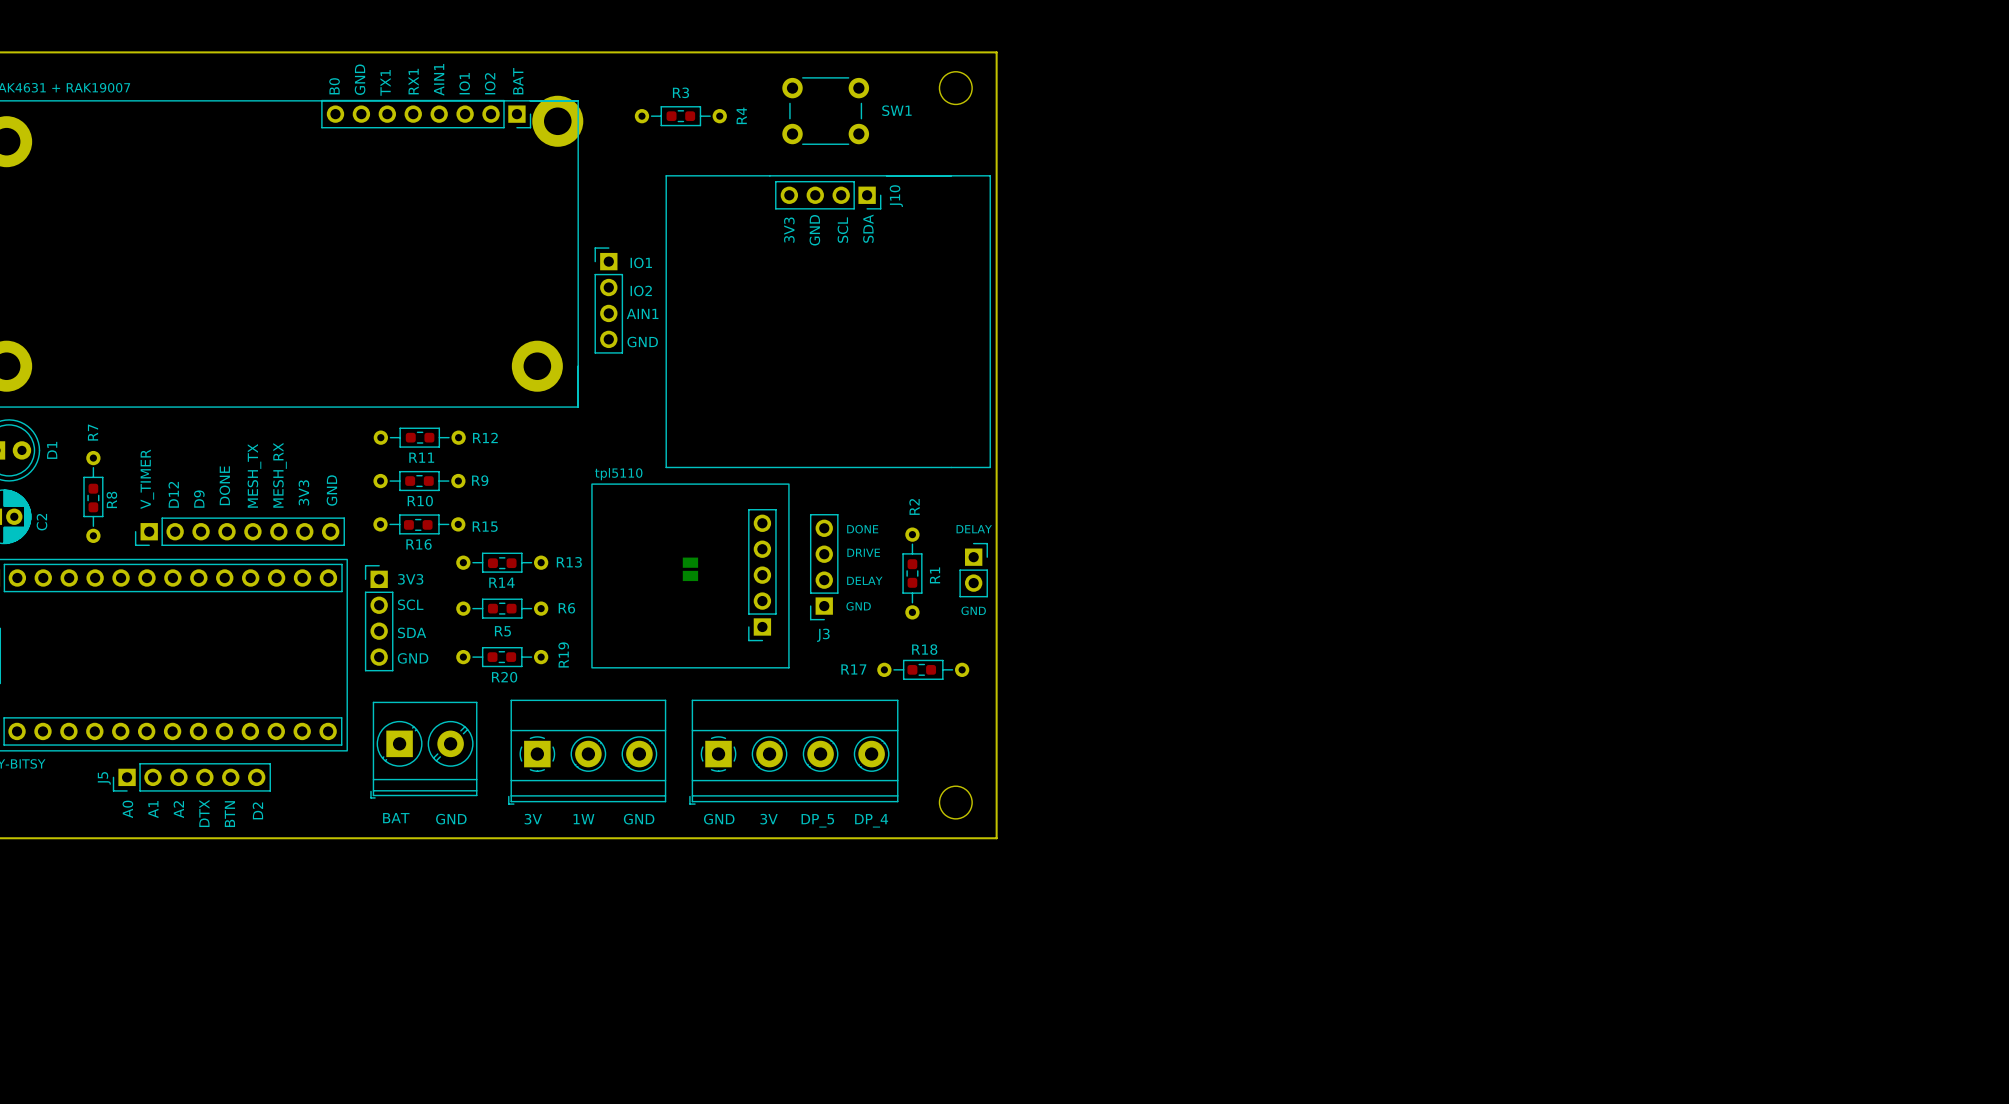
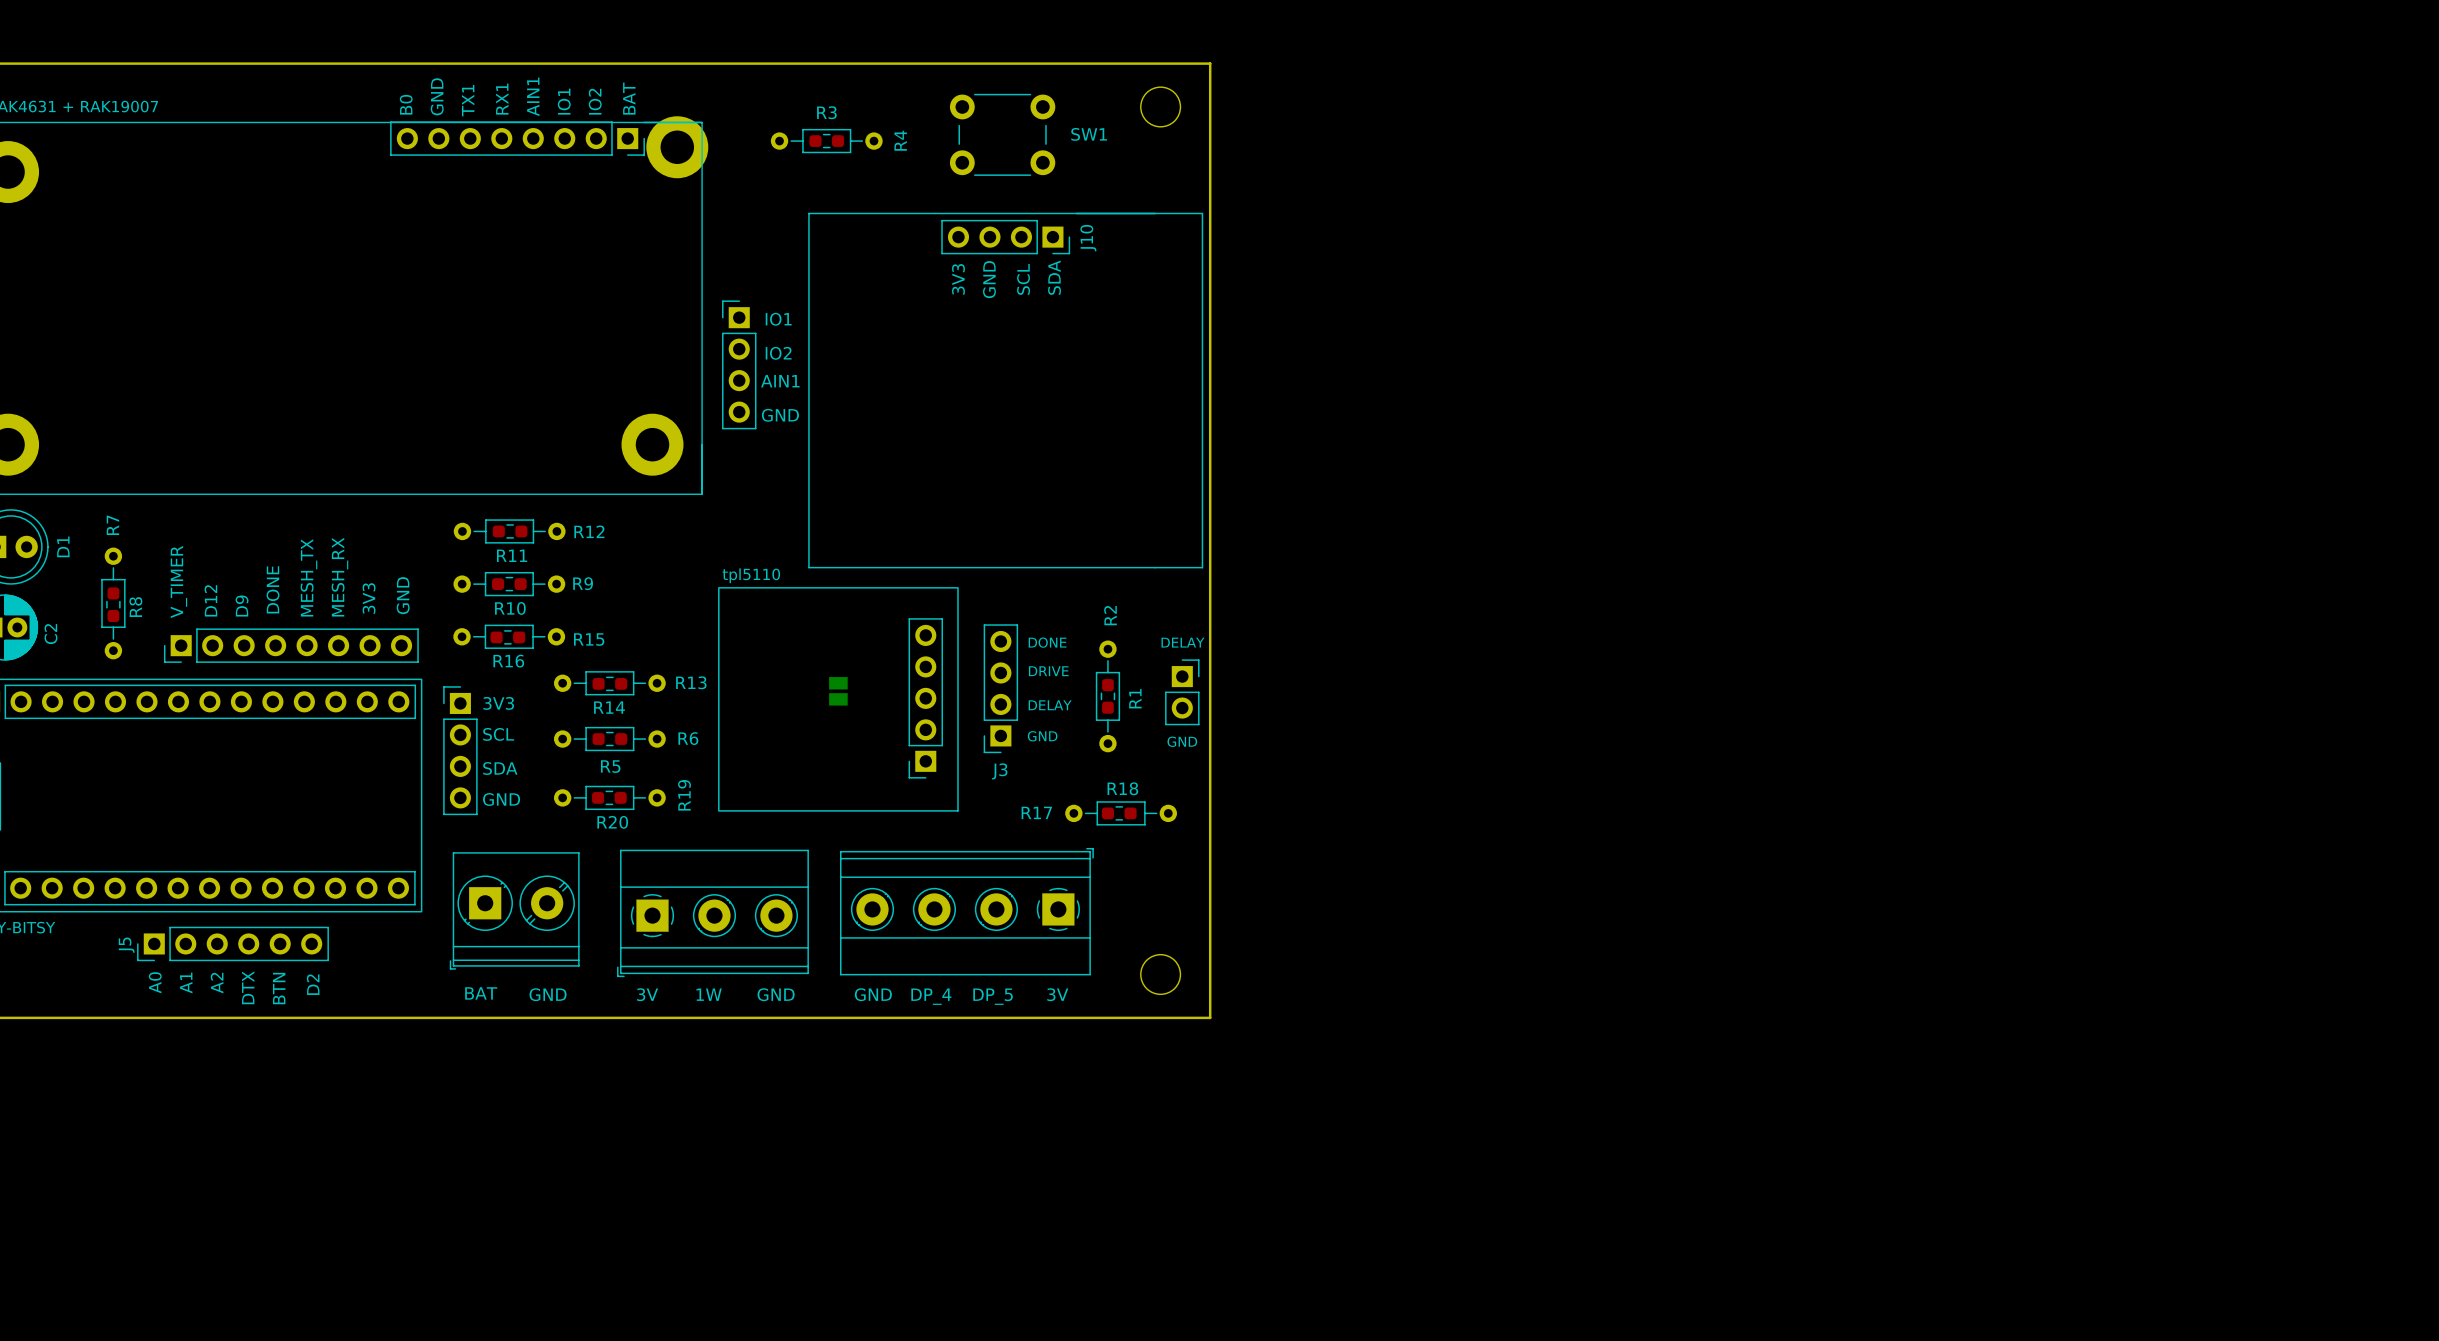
part rotation: 0° (793, 752) -> 180° (966, 911)
text: 3V (769, 819) -> DP_4 (931, 996)
text: DP_4 (871, 820) -> 3V (1057, 994)

